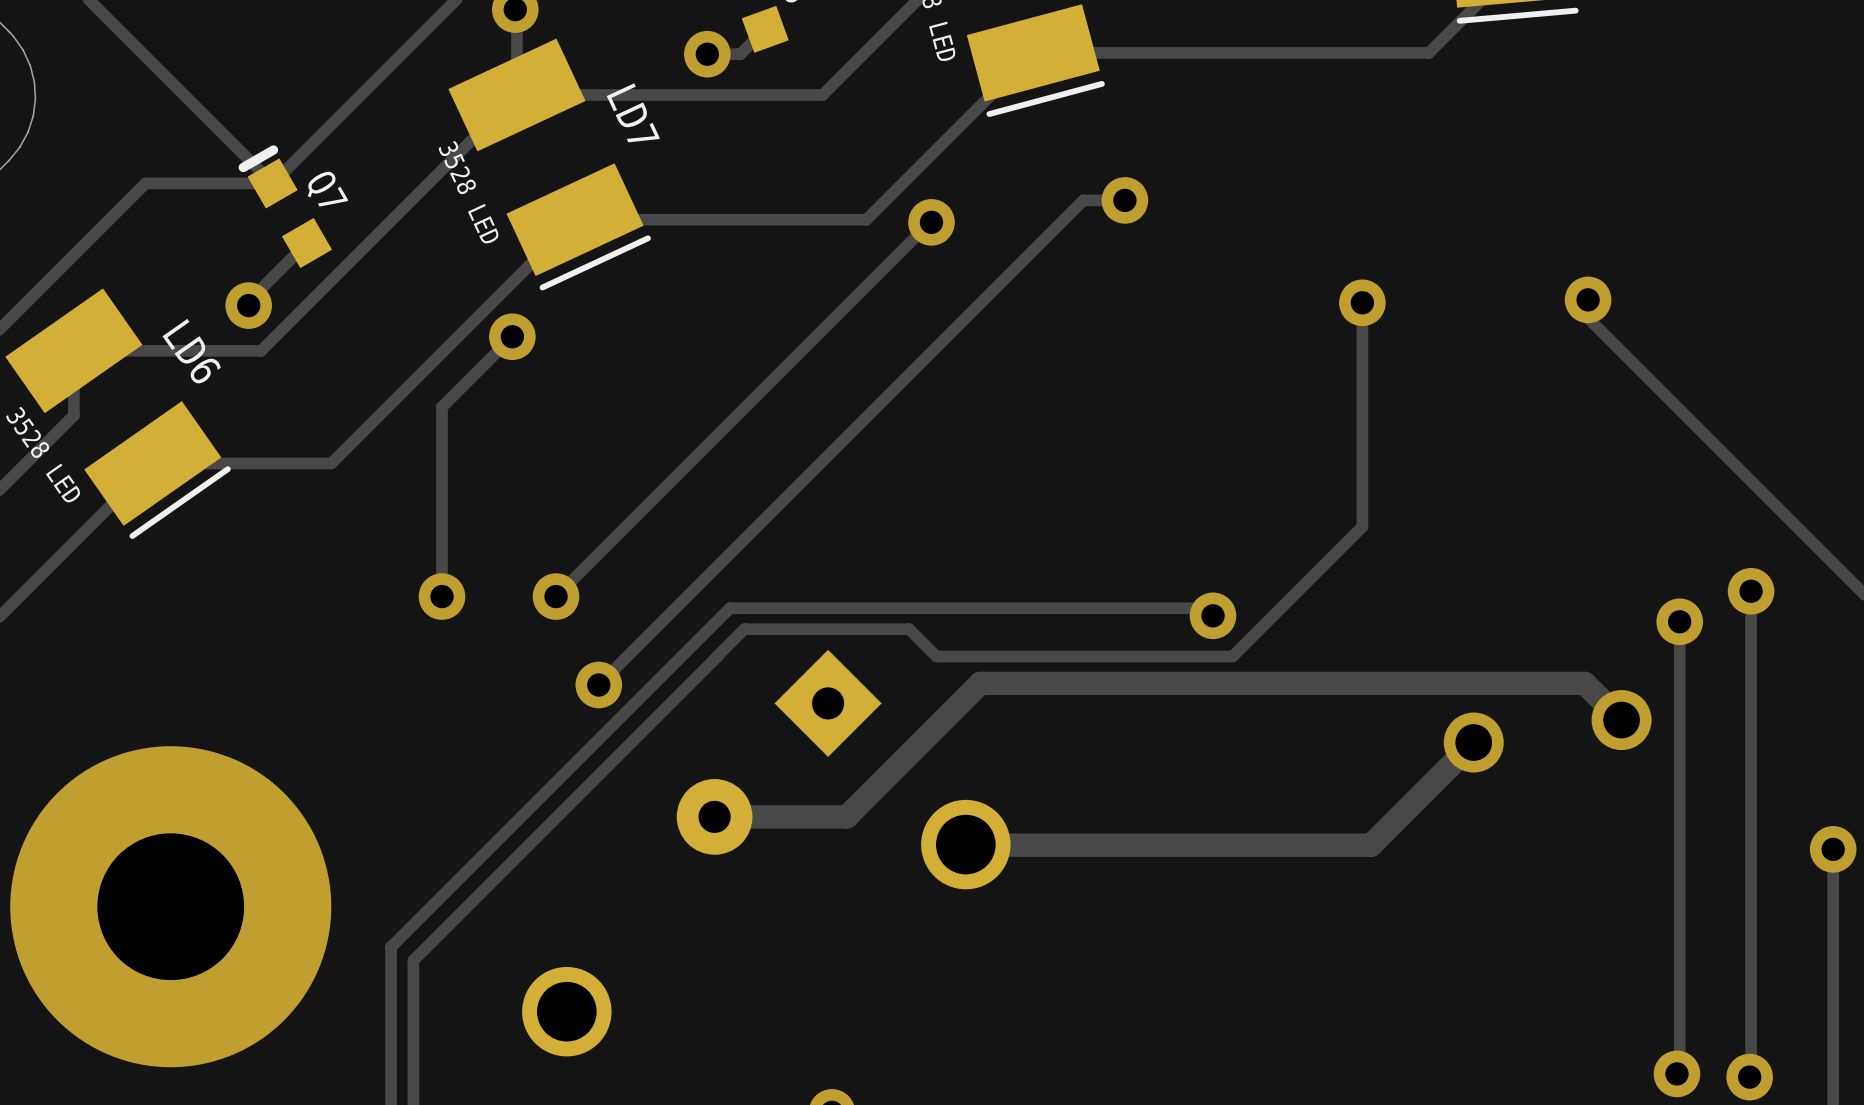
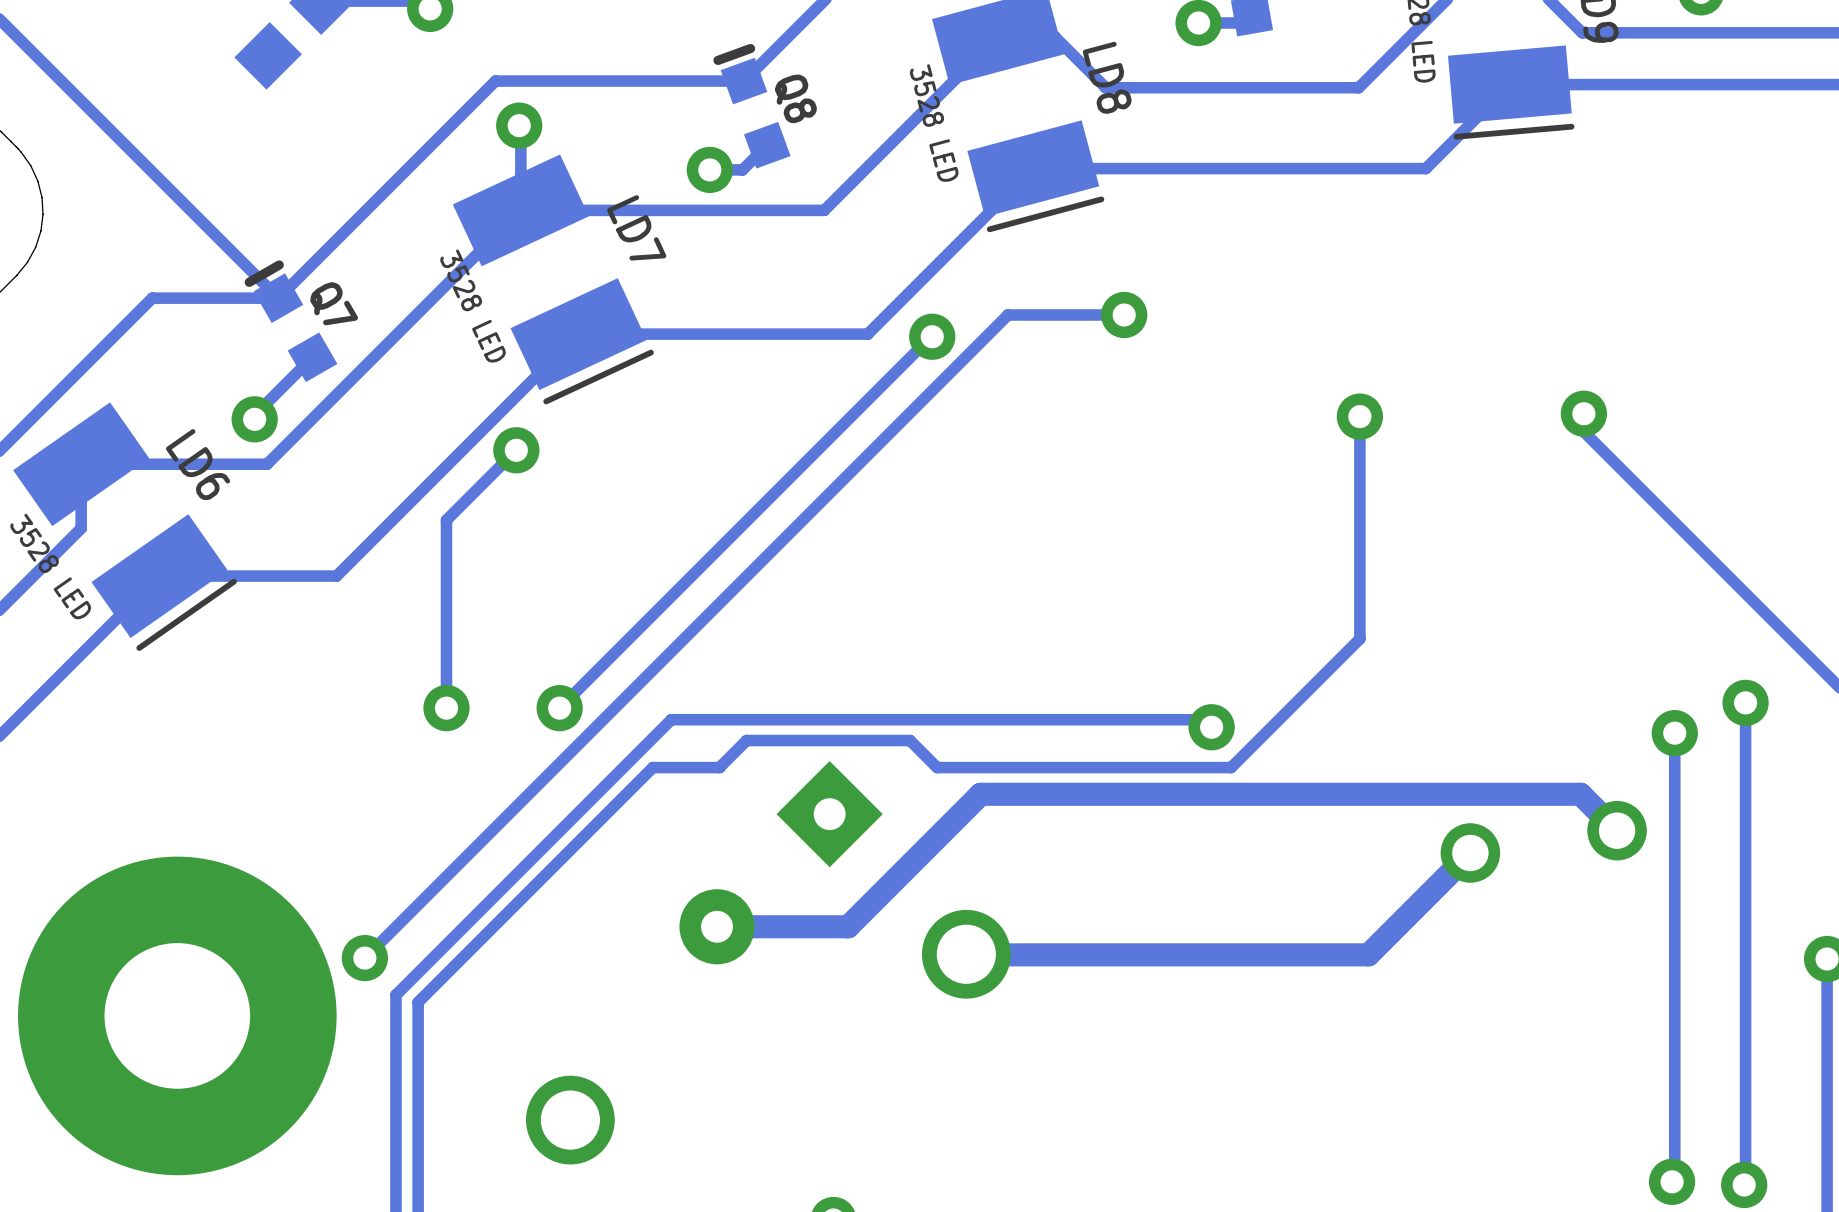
track: (1083, 200) (598, 685) -> (1082, 315) (1007, 315) (364, 958)
track: (729, 608) (391, 947) -> (732, 719) (671, 719) (395, 995) (395, 1055)
track: (717, 656) (413, 960) -> (719, 767) (652, 767) (418, 1002) (418, 1069)
via: (598, 685) -> none
via: none -> (364, 958)

